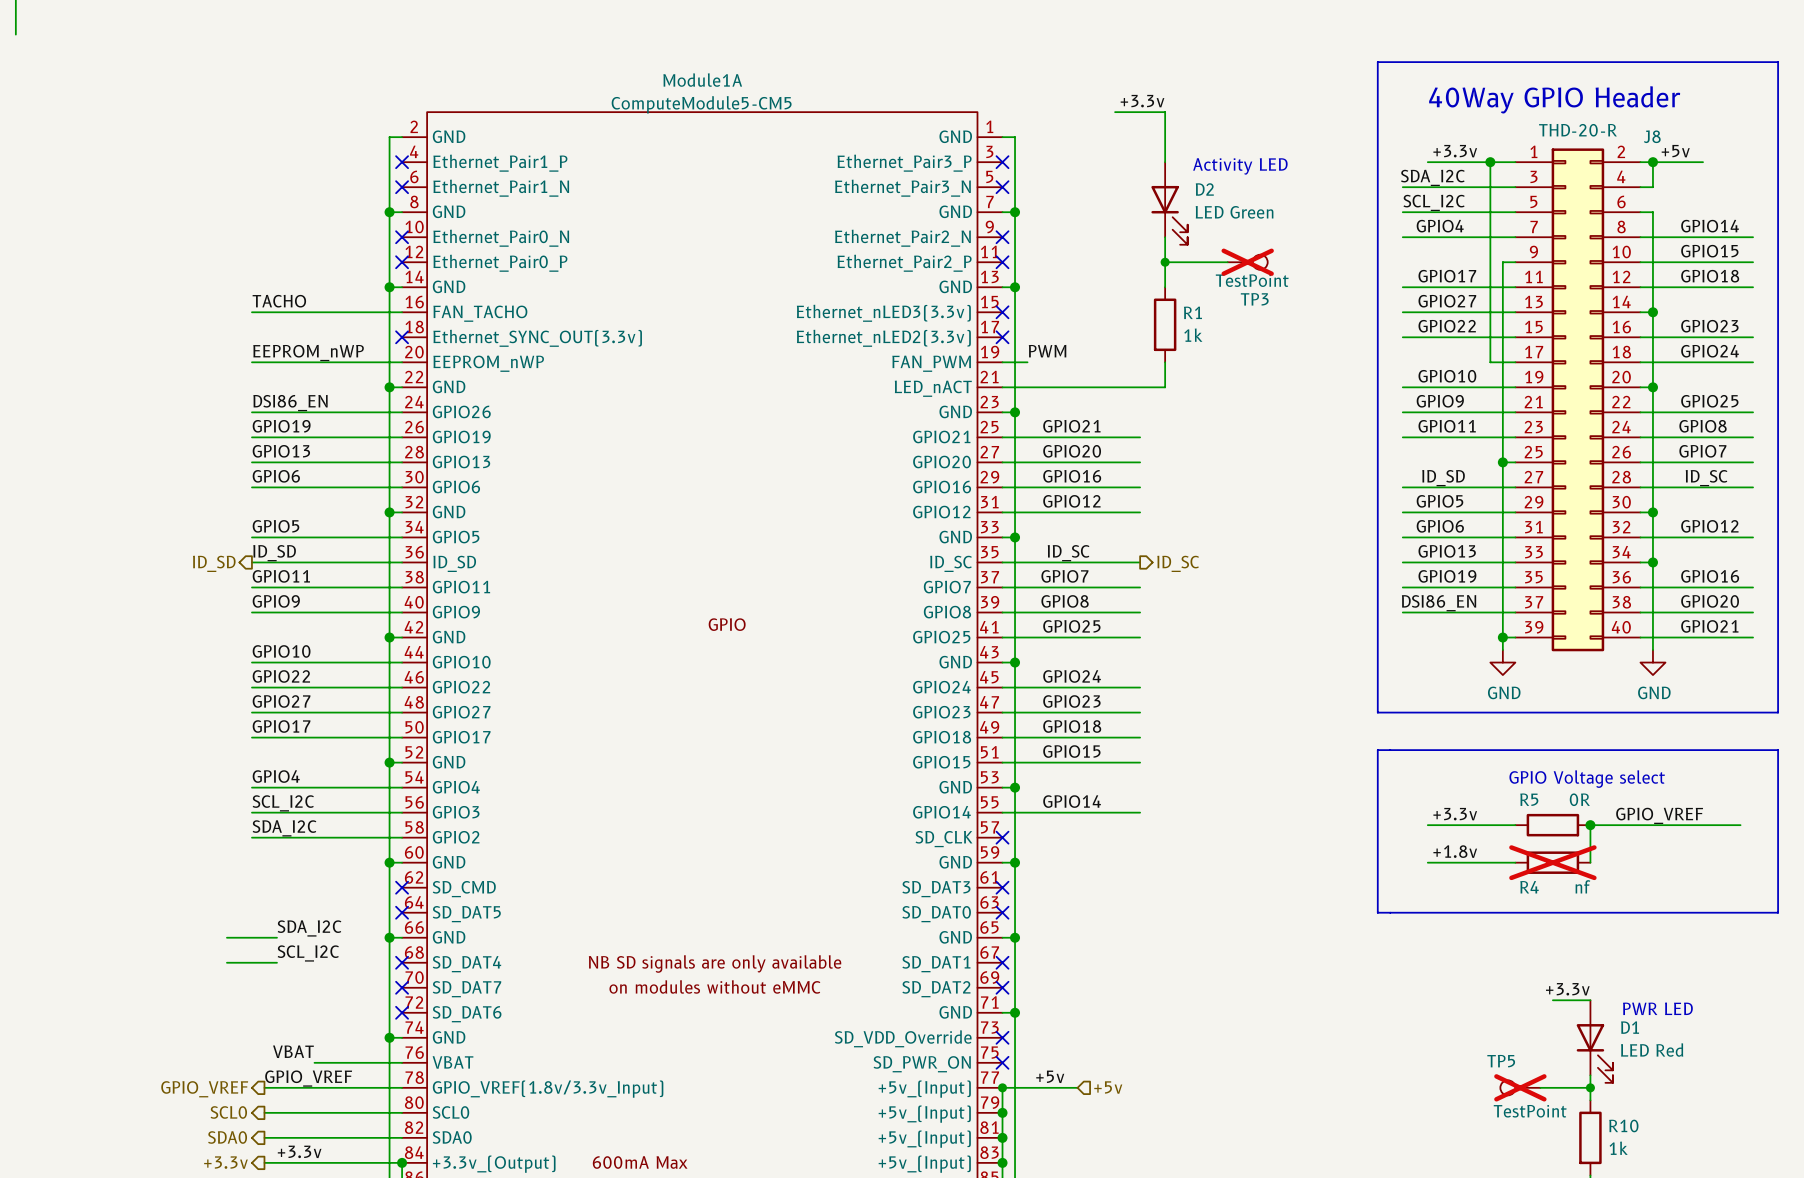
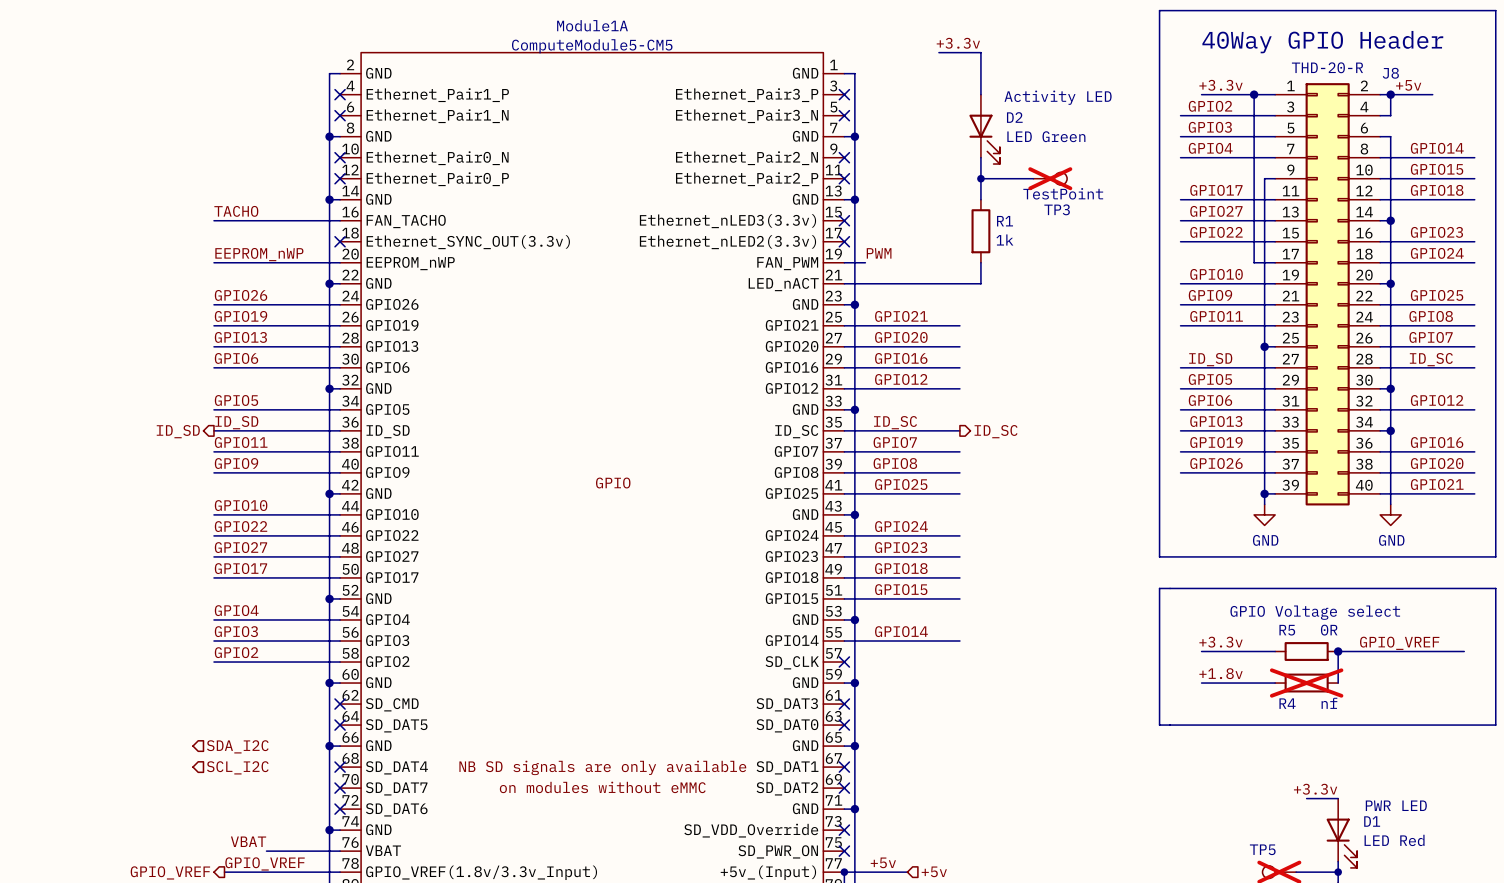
label: SDA_I2C (1432, 177) -> GPIO2 (1210, 106)
label: SCL_I2C (1434, 202) -> GPIO3 (1210, 127)
label: DSI86_EN (290, 403) -> GPIO26 (241, 295)
label: DSI86_EN (1439, 603) -> GPIO26 (1216, 463)
label: SCL_I2C (283, 803) -> GPIO3 (236, 631)
label: SDA_I2C (284, 828) -> GPIO2 (236, 652)
label: SDA_I2C (309, 928) -> none
wire: (226, 937) (276, 937) -> none
hierarchical label: none -> SDA_I2C (237, 746)
label: SCL_I2C (308, 953) -> none
wire: (226, 962) (276, 962) -> none
hierarchical label: none -> SCL_I2C (237, 767)

